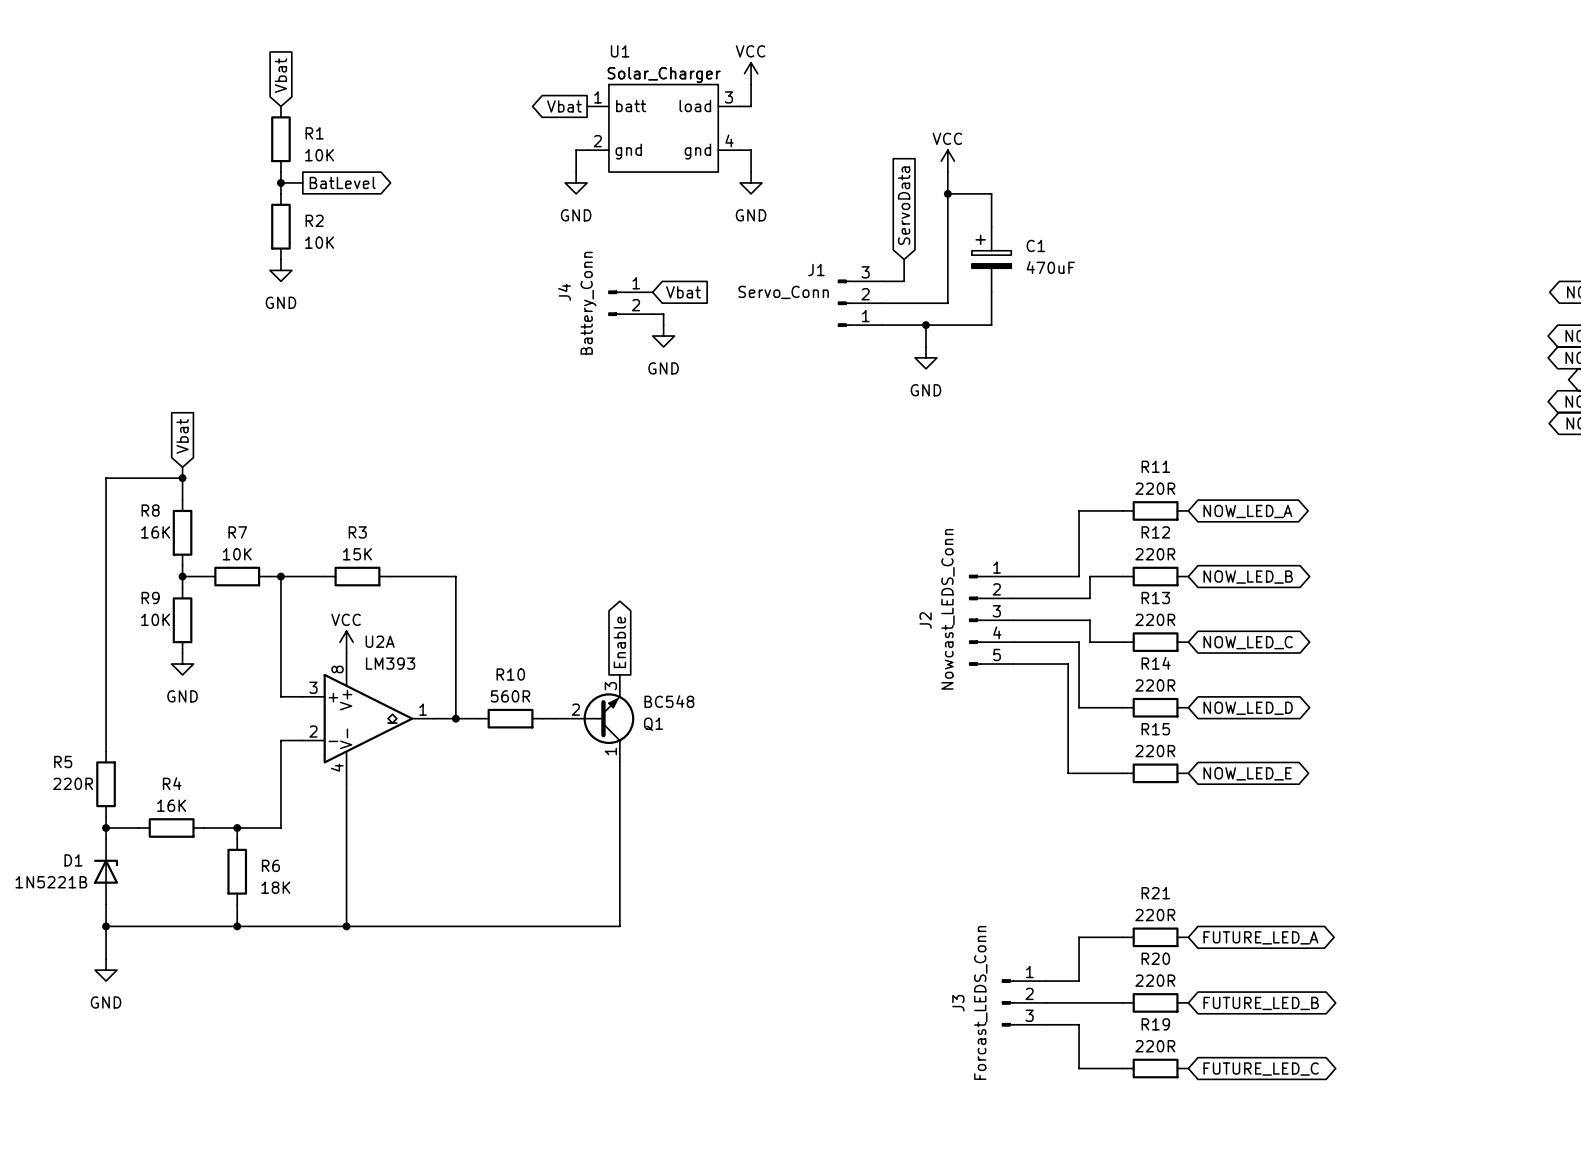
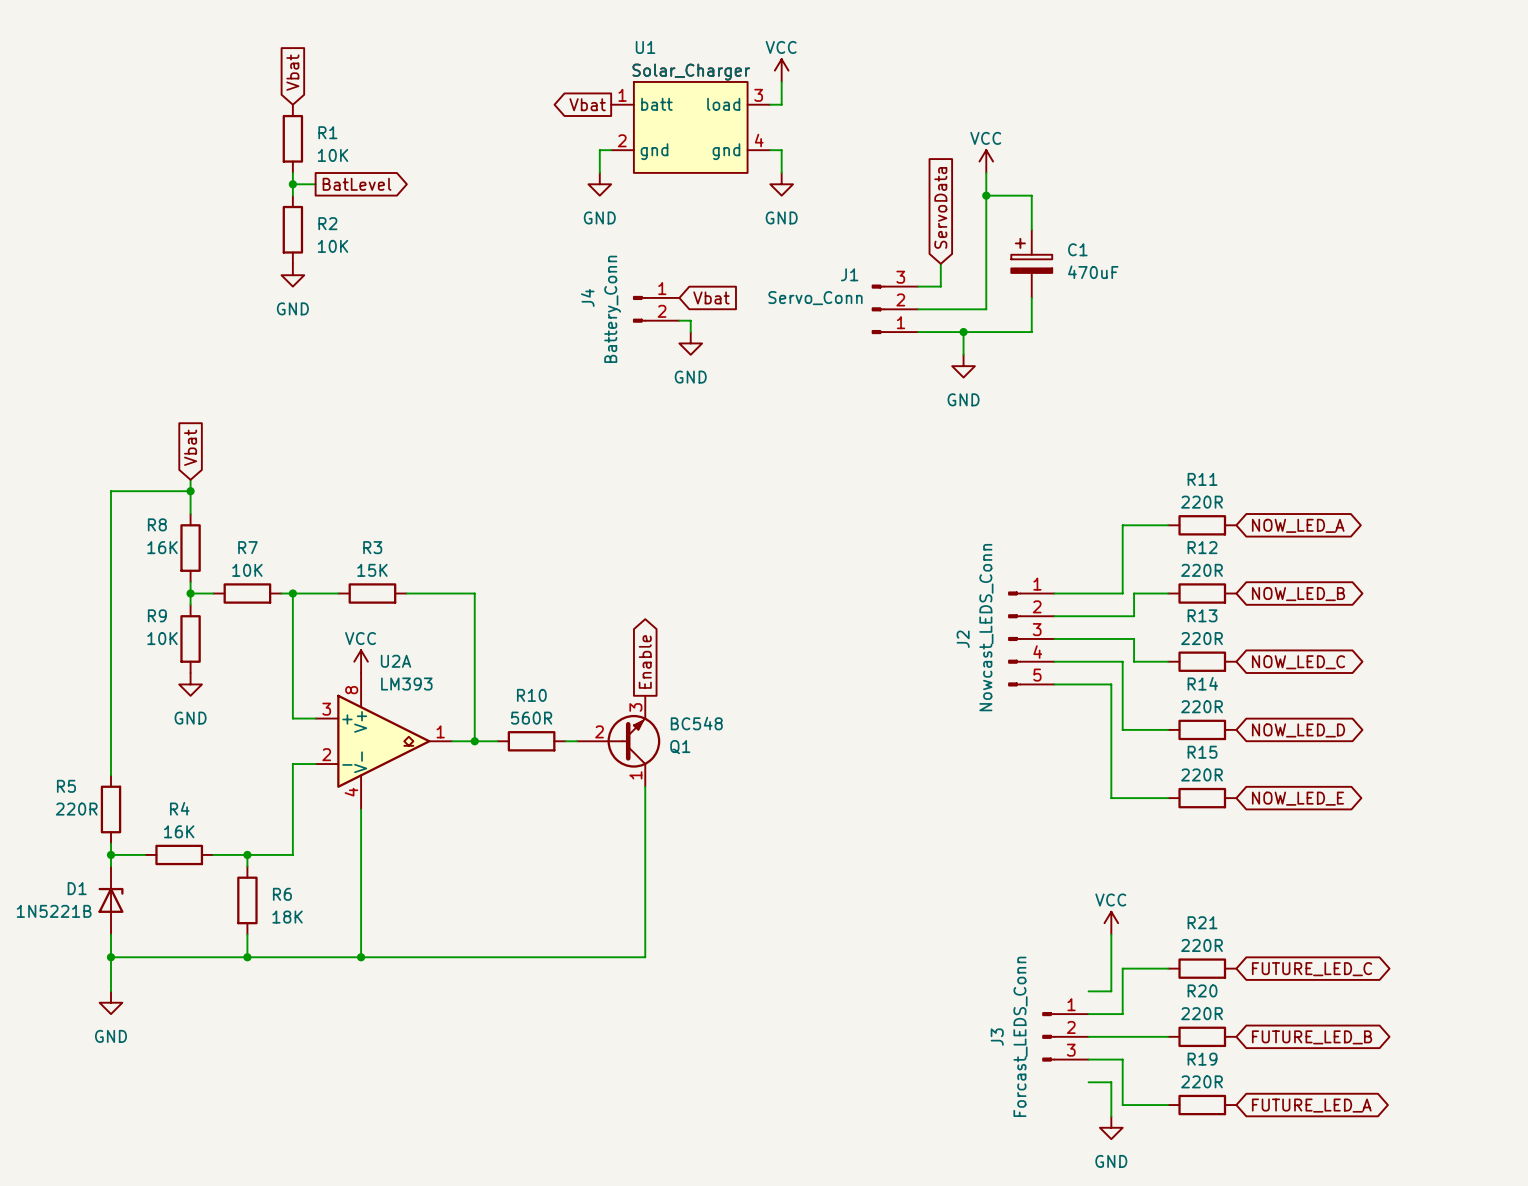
power symbol: none -> VCC (1111, 923)
wire: none -> (1111, 934) (1111, 991) (1088, 991)
global label: FUTURE_LED_A (1260, 937) -> FUTURE_LED_C (1312, 969)
wire: none -> (1088, 1082) (1111, 1082) (1111, 1116)
global label: FUTURE_LED_C (1261, 1069) -> FUTURE_LED_A (1311, 1105)
power symbol: none -> GND (1111, 1127)

